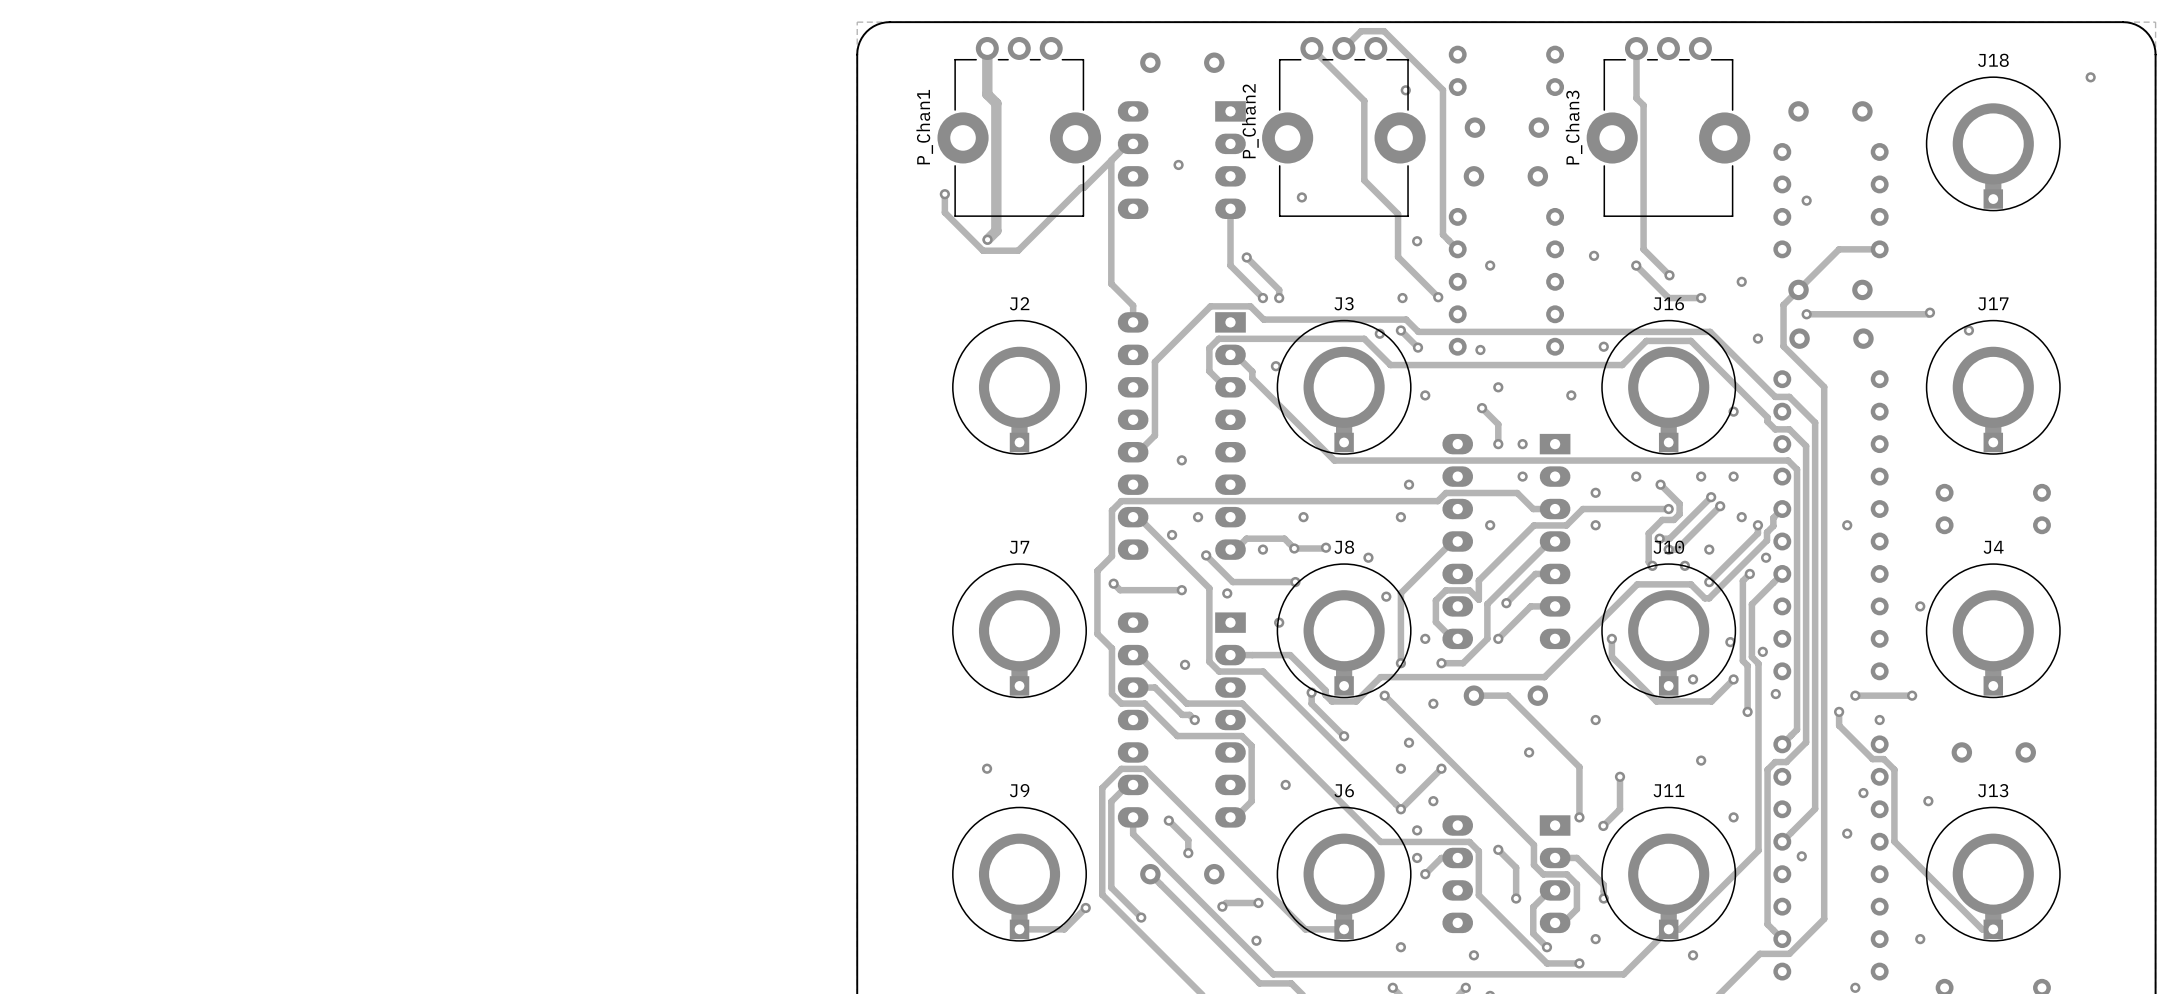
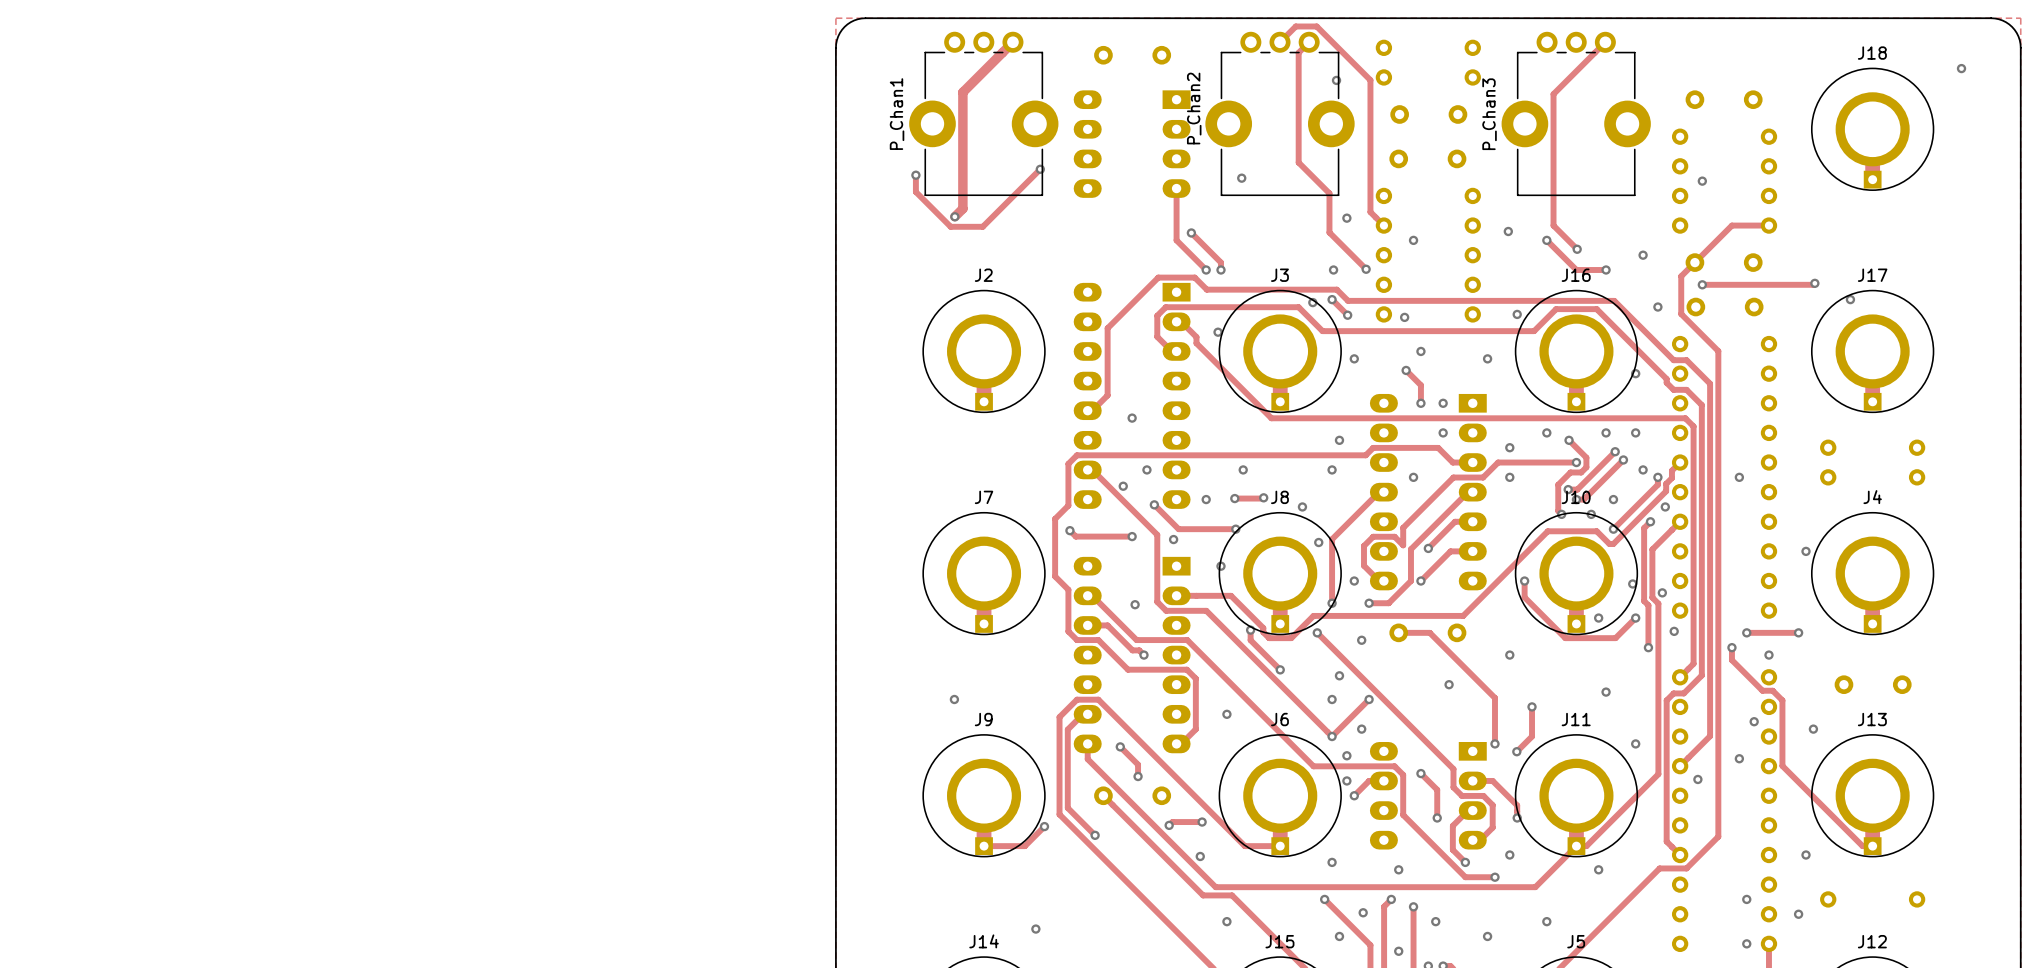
track: (987, 48) (987, 94) (996, 103) -> (1012, 42) (962, 92)
track: (1311, 48) (1364, 100) -> (1309, 42) (1298, 52) (1298, 90)
track: (1636, 48) (1636, 98) (1643, 105) -> (1605, 42) (1553, 94)
track: (1133, 143) (1128, 143) (1084, 187) (1081, 187) -> none
track: (1111, 160) (1111, 283) (1133, 305) (1133, 322) -> none
via: (1178, 164) -> none
via: none -> (1040, 169)
track: (1294, 548) (1284, 538) (1246, 538) (1235, 549) (1230, 549) -> none

